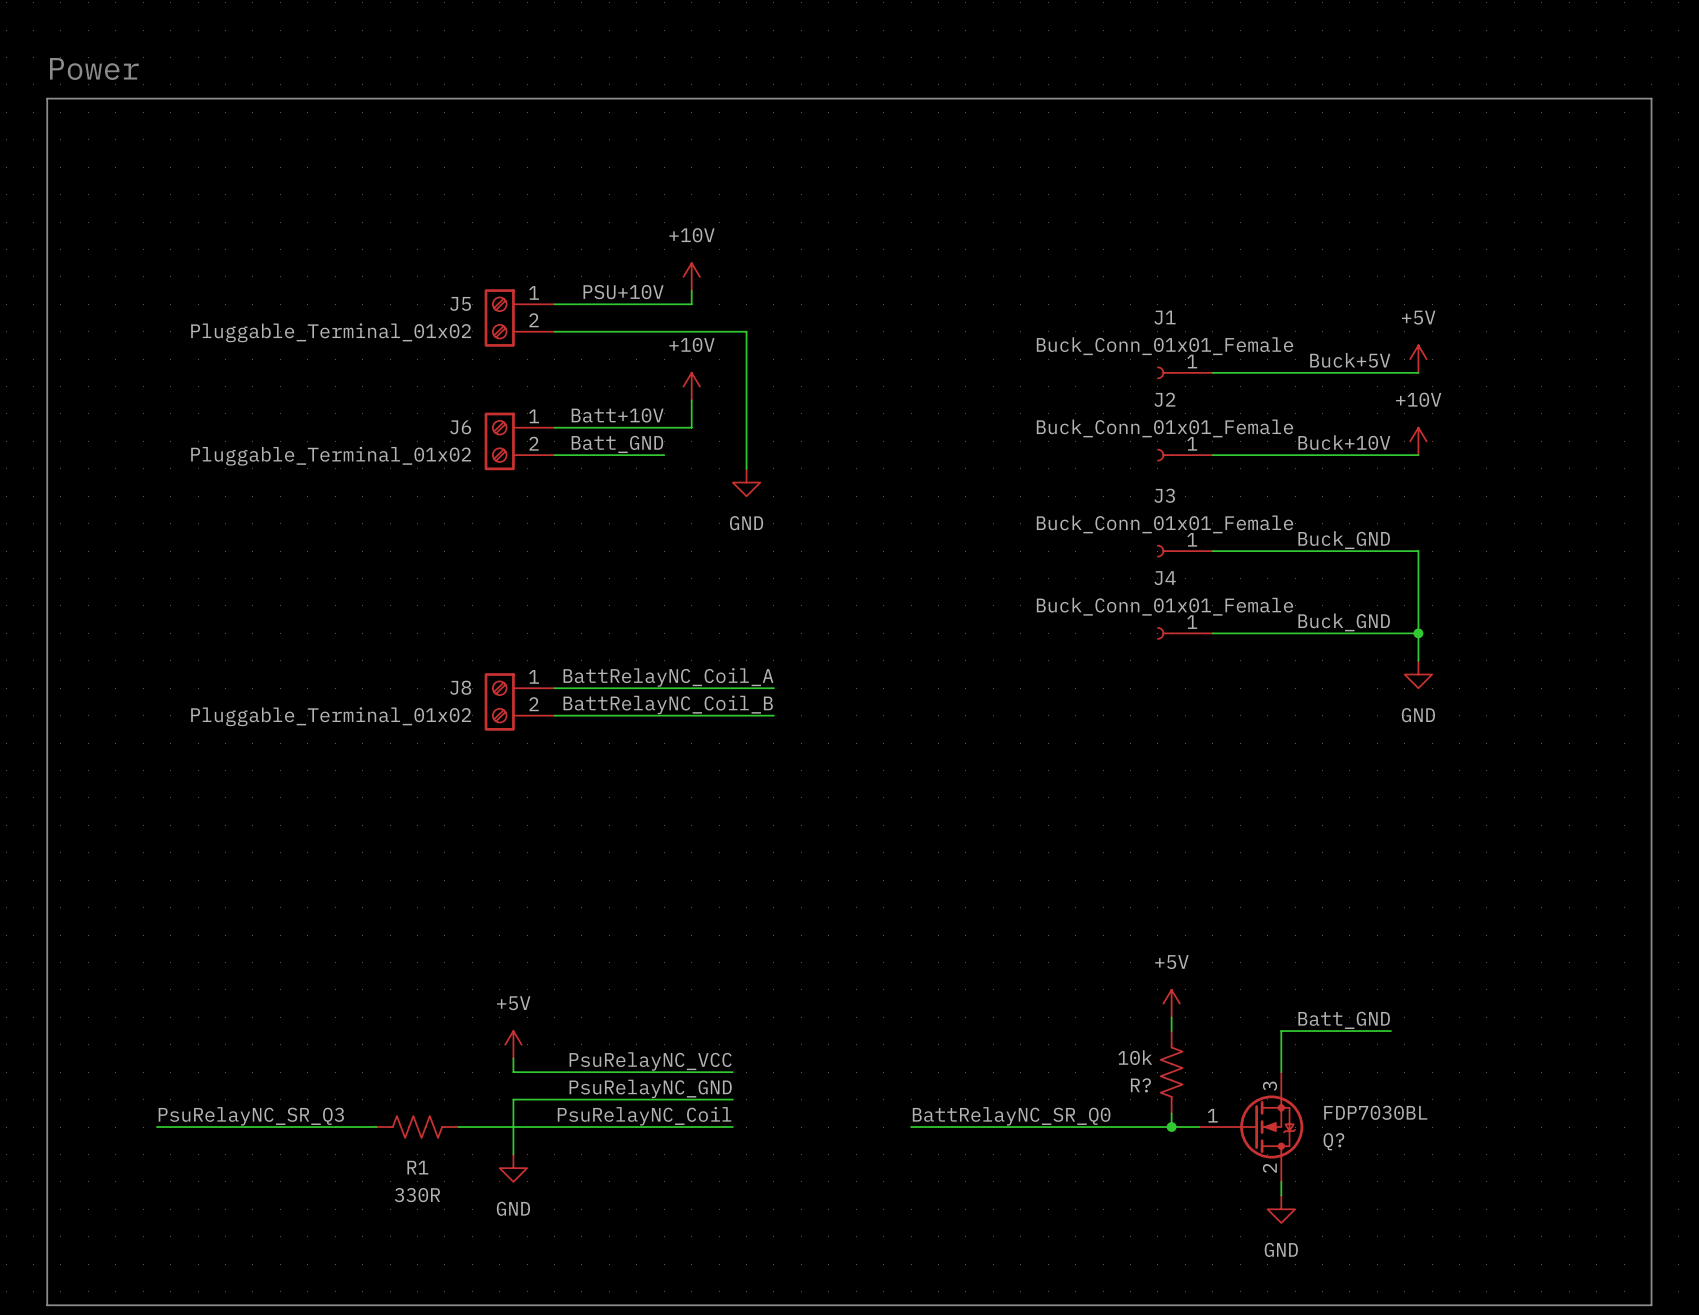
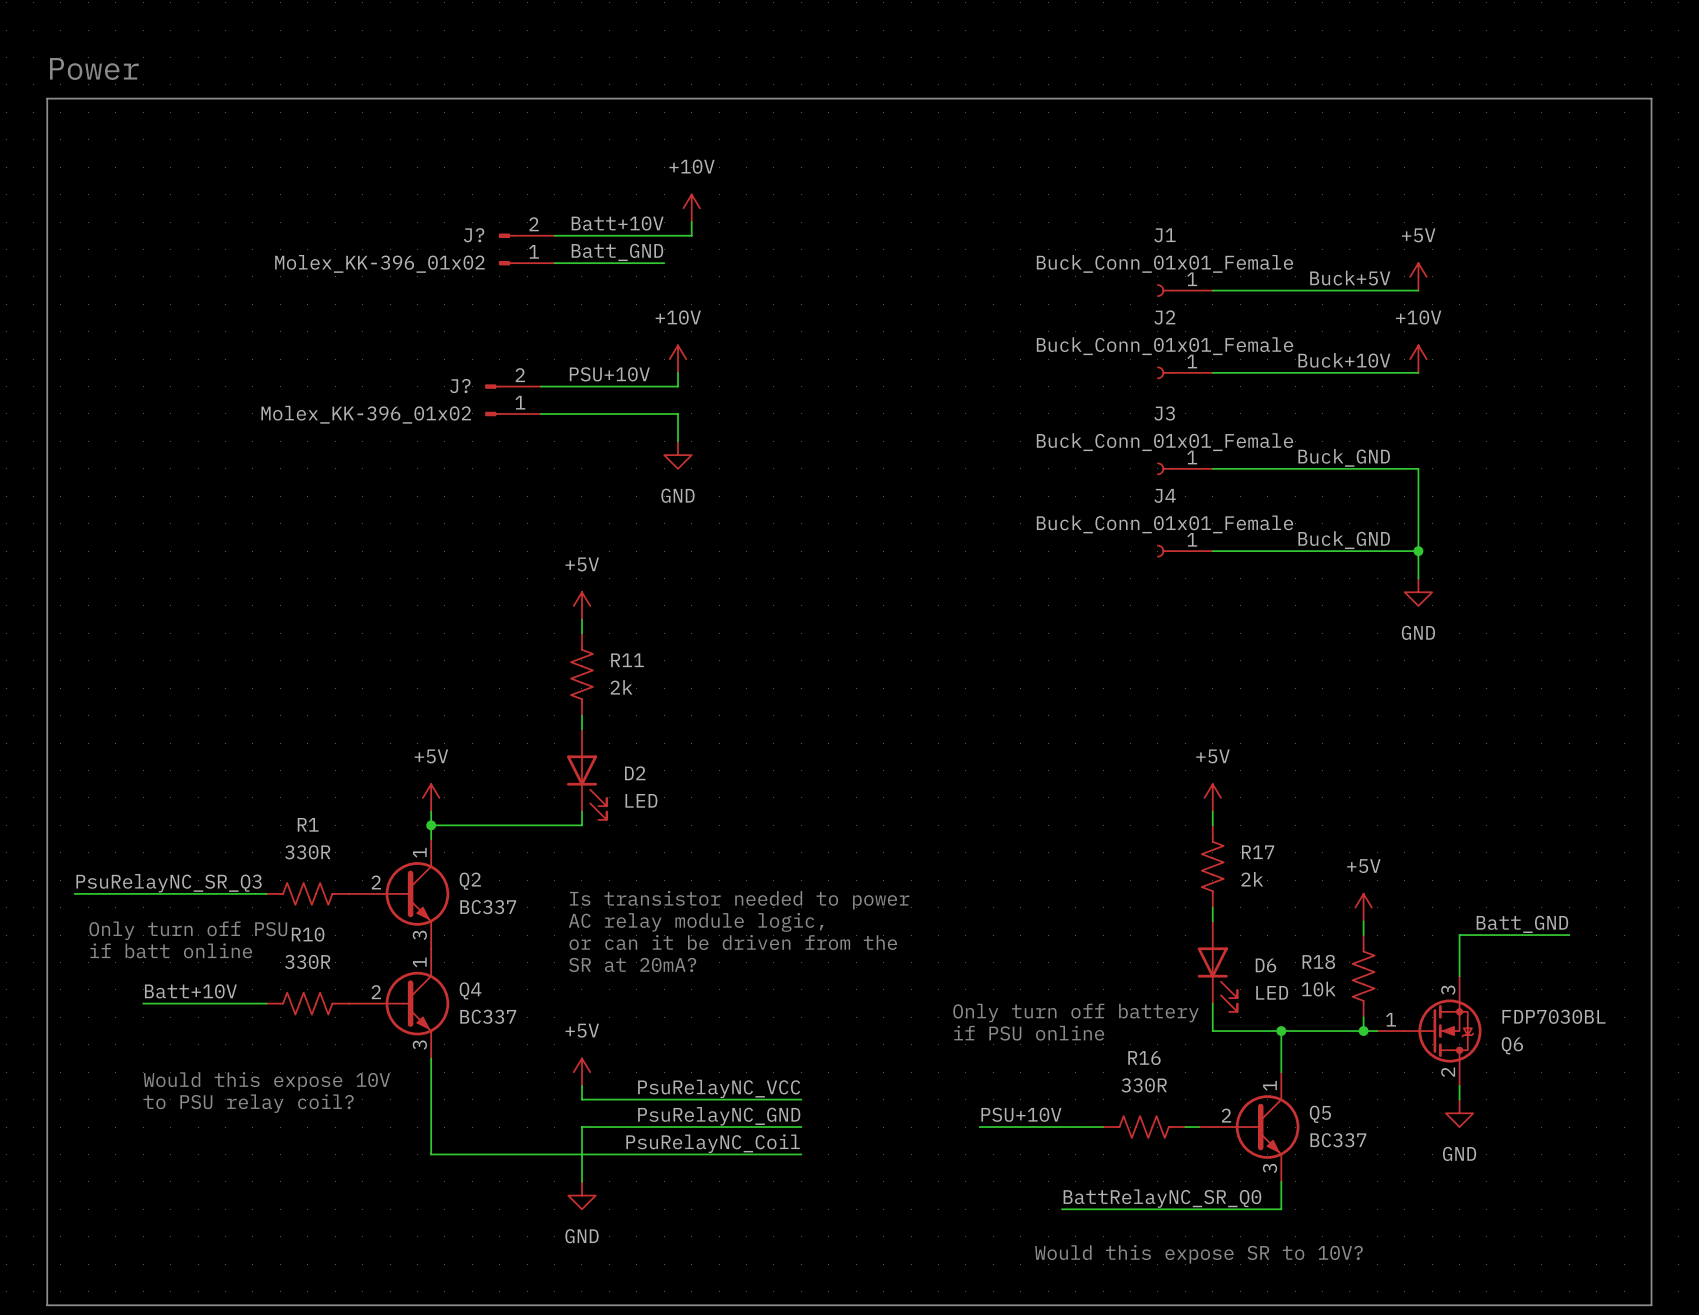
power symbol: none -> +10V (691, 208)
J?: none -> Molex_KK-396_01x02 (526, 249)
power symbol: +10V (691, 276) -> none
power symbol: none -> +5V (1418, 276)
label: none -> Buck+5V (1350, 278)
wire: (691, 290) (691, 304) (554, 304) -> (691, 222) (691, 235) (554, 235)
J1: none -> Buck_Conn_01x01_Female (1184, 290)
label position: PSU+10V (623, 292) -> PSU+10V (609, 374)
J1 name: J1 (1165, 317) -> J2 (1164, 317)
J5: Pluggable_Terminal_01x02 (519, 318) -> none
wire: (554, 331) (746, 331) (746, 468) -> none
power symbol: +5V (1418, 359) -> +10V (1418, 359)
label: Buck+5V (1350, 360) -> Buck+10V (1344, 360)
wire: none -> (677, 372) (677, 386) (540, 386)
power symbol position: +10V (691, 386) -> +10V (677, 359)
J?: none -> Molex_KK-396_01x02 (513, 400)
wire: (691, 400) (691, 427) (554, 427) -> none
wire: none -> (540, 413) (677, 413) (677, 441)
label position: Batt+10V (617, 415) -> Batt+10V (617, 223)
J6: Pluggable_Terminal_01x02 (519, 441) -> none
power symbol: +10V (1418, 441) -> none
label: Buck+10V (1344, 442) -> none
label position: Batt_GND (617, 444) -> Batt_GND (617, 252)
wire: (554, 455) (664, 455) -> (554, 263) (664, 263)
J2: Buck_Conn_01x01_Female (1184, 455) -> none
wire: (1212, 455) (1418, 455) -> (1212, 290) (1418, 290)
J3: none -> Buck_Conn_01x01_Female (1184, 468)
wire: none -> (1212, 468) (1418, 468) (1418, 551)
power symbol position: GND (746, 482) -> GND (677, 455)
J3 name: J3 (1164, 495) -> J4 (1165, 495)
junction: none -> (1418, 551)
wire: (1418, 578) (1418, 660) -> none
power symbol: none -> +5V (581, 605)
wire: none -> (581, 619) (581, 633)
label position: Buck_GND (1344, 622) -> Buck_GND (1344, 457)
J4: Buck_Conn_01x01_Female (1184, 633) -> none
wire: (1212, 633) (1418, 633) -> none
junction: (1418, 633) -> none
R11: none -> 2k (581, 674)
power symbol position: GND (1418, 674) -> GND (1418, 592)
label: BattRelayNC_Coil_A (668, 677) -> none
wire: (554, 688) (773, 688) -> none
J8: Pluggable_Terminal_01x02 (519, 701) -> none
label: BattRelayNC_Coil_B (668, 704) -> none
wire: (554, 715) (773, 715) -> none
wire: none -> (581, 715) (581, 729)
D2: none -> LED (586, 774)
power symbol: none -> +5V (431, 797)
power symbol: none -> +5V (1212, 797)
wire: none -> (431, 811) (431, 839)
wire: none -> (581, 811) (581, 825) (431, 825)
junction: none -> (431, 825)
R17: none -> 2k (1212, 866)
wire: none -> (74, 893) (266, 893)
Q2: none -> BC337 (399, 893)
text: none -> Is transistor needed to power (739, 900)
power symbol: none -> +5V (1363, 907)
wire: none -> (1363, 921) (1363, 935)
text: none -> AC relay module logic, (696, 922)
text: none -> Only turn off PSU (188, 930)
wire: none -> (1569, 935) (1459, 935) (1459, 976)
text: none -> or can it be driven from the (733, 942)
text: none -> if batt online (171, 950)
text: none -> SR at 20mA? (632, 964)
D6: none -> LED (1217, 966)
R18: none -> 10k (1363, 976)
label: none -> Batt+10V (190, 991)
wire: none -> (143, 1003) (266, 1003)
R10: none -> 330R (307, 1003)
Q4: none -> BC337 (399, 1003)
power symbol: +5V (1171, 1003) -> none
wire: none -> (1212, 1003) (1212, 1031) (1281, 1031)
text: none -> Only turn off battery (1076, 1012)
wire: (1171, 1017) (1171, 1031) -> (1212, 811) (1212, 825)
wire: none -> (1363, 1017) (1363, 1031)
label position: Batt_GND (1344, 1020) -> Batt_GND (1522, 924)
junction: none -> (1281, 1031)
junction: none -> (1363, 1031)
Q6: none -> FDP7030BL (1429, 1031)
text: none -> if PSU online (1029, 1033)
power symbol position: +5V (513, 1044) -> +5V (581, 1072)
wire: none -> (431, 1058) (431, 1154) (801, 1154)
wire: (513, 1058) (513, 1072) (732, 1072) -> none
label position: PsuRelayNC_VCC (650, 1061) -> PsuRelayNC_VCC (719, 1088)
R?: 10k (1171, 1072) -> none
text: none -> Would this expose 10V (266, 1081)
wire: none -> (1459, 1085) (1459, 1099)
label position: PsuRelayNC_GND (650, 1088) -> PsuRelayNC_GND (719, 1116)
wire: (581, 1099) (513, 1099) (513, 1154) -> (581, 1099) (581, 1085)
wire: none -> (732, 1099) (801, 1099)
text: none -> to PSU relay coil? (248, 1103)
wire: (1171, 1113) (1171, 1127) -> (1212, 907) (1212, 921)
label: none -> PSU+10V (1021, 1114)
label position: PsuRelayNC_SR_Q3 (251, 1116) -> PsuRelayNC_SR_Q3 (169, 883)
label position: PsuRelayNC_Coil (644, 1116) -> PsuRelayNC_Coil (713, 1143)
label position: BattRelayNC_SR_Q0 (1011, 1116) -> BattRelayNC_SR_Q0 (1162, 1198)
wire: (156, 1127) (376, 1127) -> none
R1 position: (417, 1127) -> (307, 893)
wire: (458, 1127) (581, 1127) -> (581, 1181) (581, 1127)
wire: (911, 1127) (979, 1127) -> (732, 1127) (801, 1127)
R16: none -> 330R (1144, 1127)
junction: (1171, 1127) -> none
Q5: none -> BC337 (1249, 1127)
Q?: FDP7030BL (1251, 1127) -> none
R1 name position: R1 (417, 1167) -> R1 (308, 824)
power symbol position: GND (513, 1168) -> GND (581, 1195)
R1 value position: 330R (417, 1195) -> 330R (307, 852)
wire: none -> (1281, 1195) (1281, 1209) (1061, 1209)
power symbol position: GND (1281, 1209) -> GND (1459, 1113)
text: none -> Would this expose SR to 10V? (1198, 1254)

